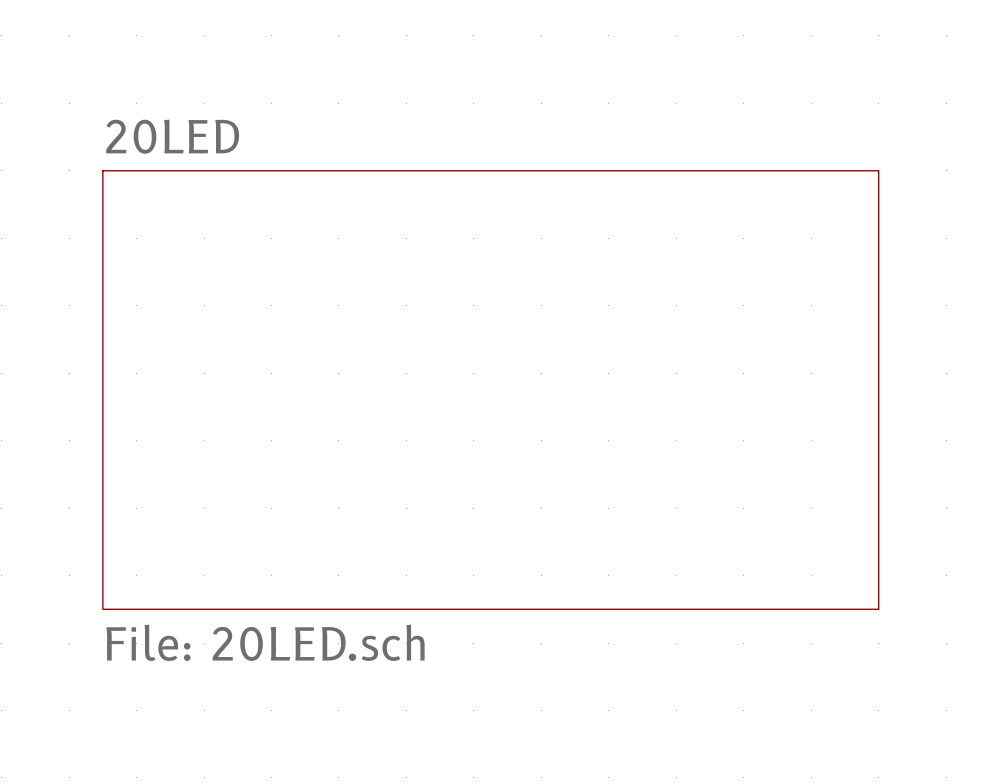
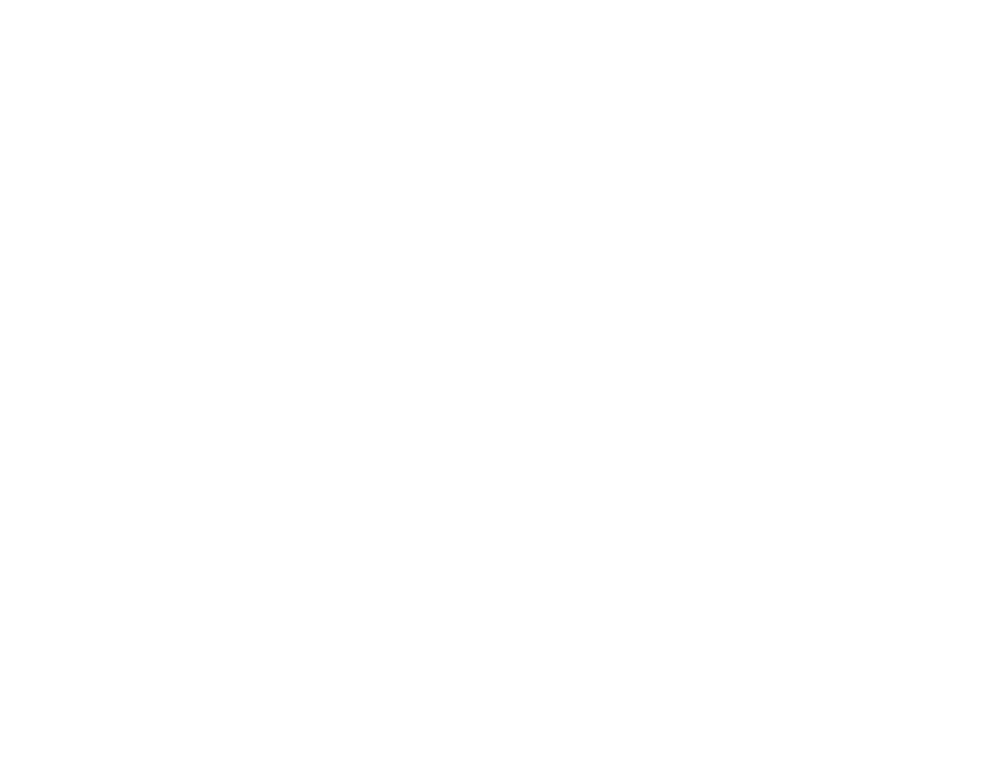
sheet 20LED: File: 20LED.sch (490, 390) -> none

